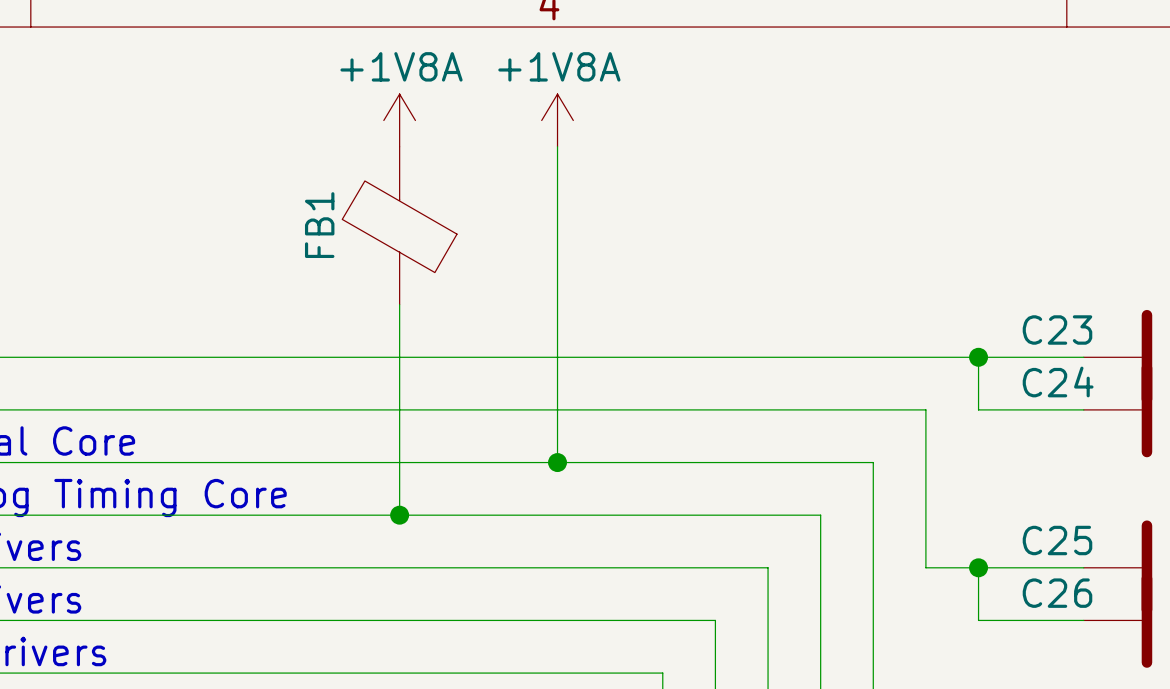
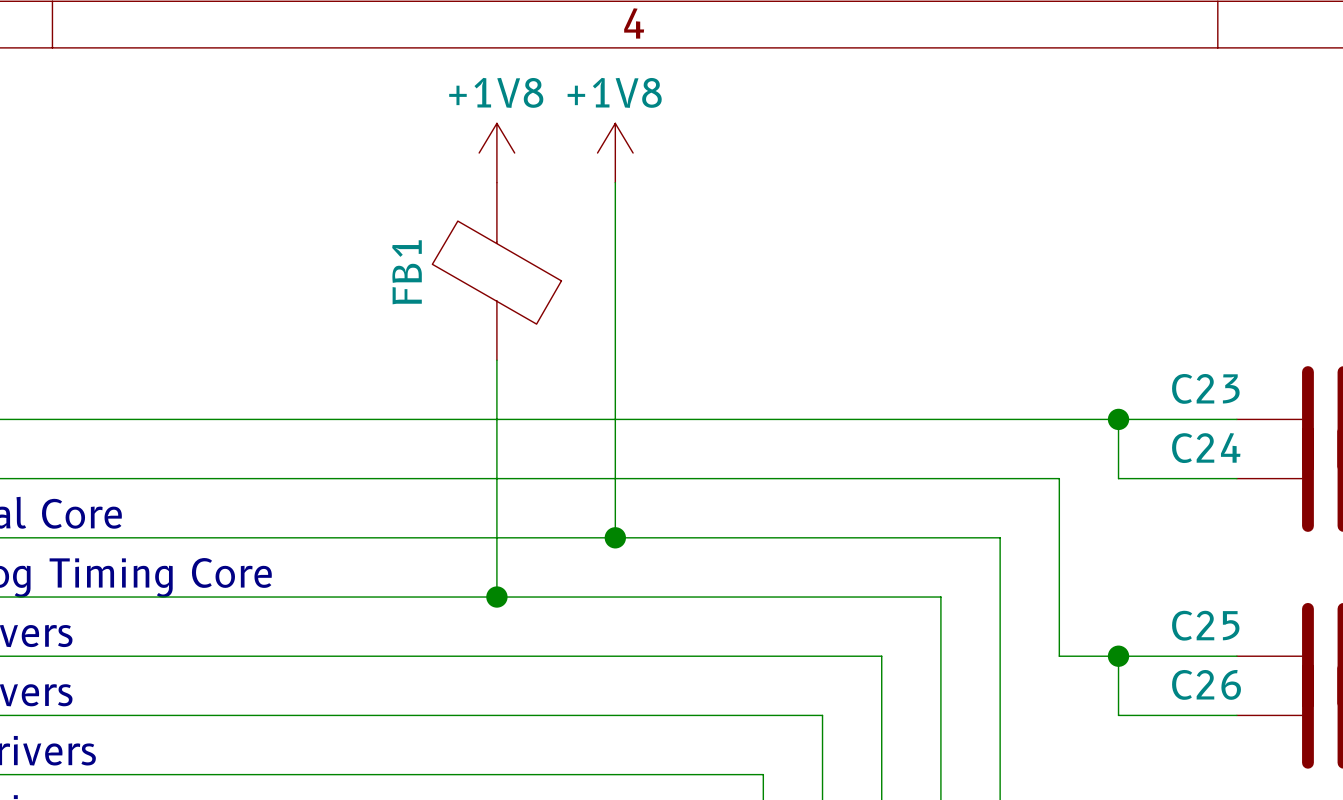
power symbol: +1V8A (399, 120) -> none
power symbol: none -> +1V8 (496, 153)
power symbol: none -> +1V8 (615, 153)
power symbol: +1V8A (557, 120) -> none
wire: (557, 146) (557, 462) -> (615, 182) (615, 537)
FB1 position: (399, 225) -> (496, 271)
wire: (399, 304) (399, 515) -> (496, 360) (496, 597)
junction position: (557, 462) -> (615, 537)
junction position: (399, 515) -> (496, 597)

